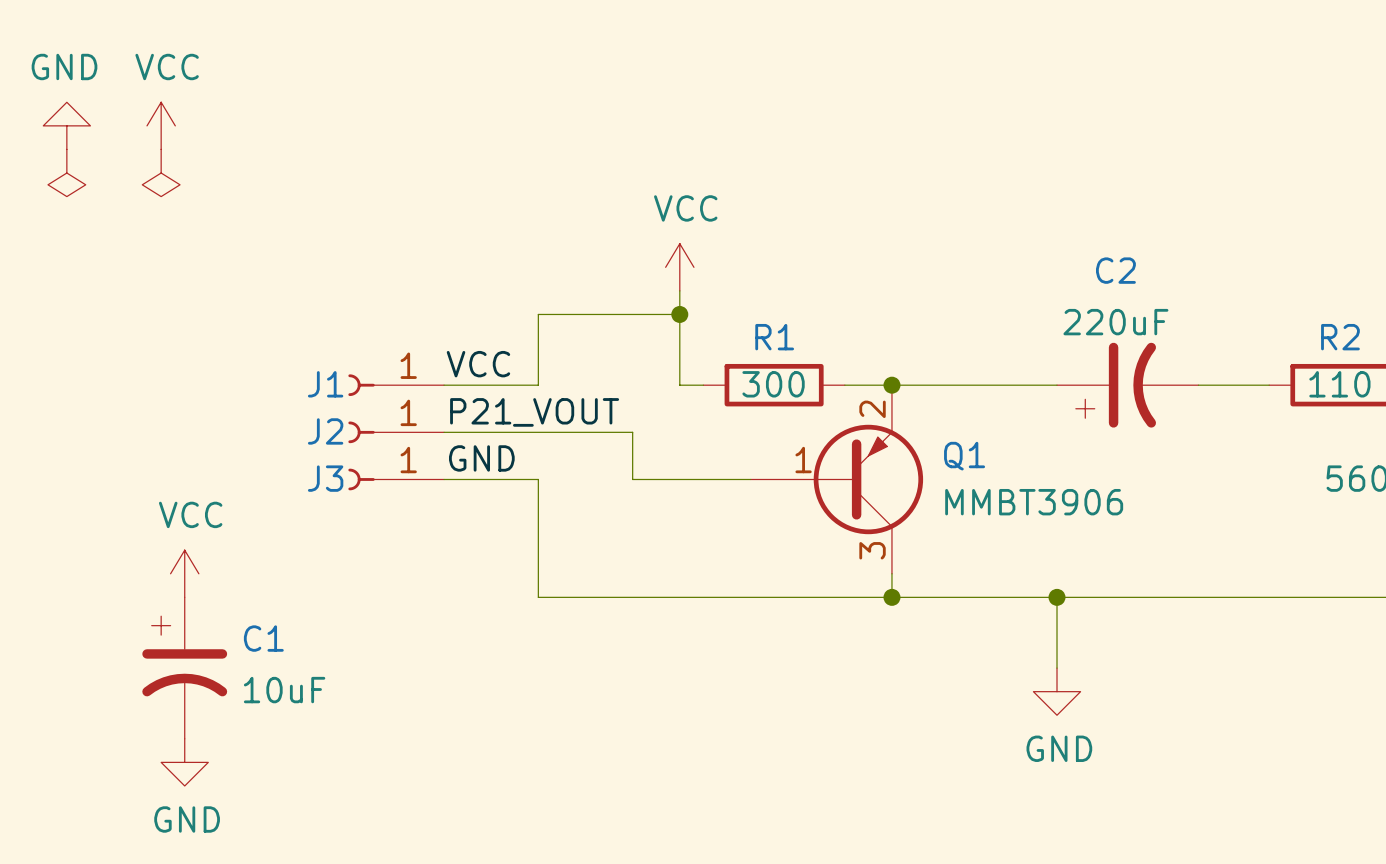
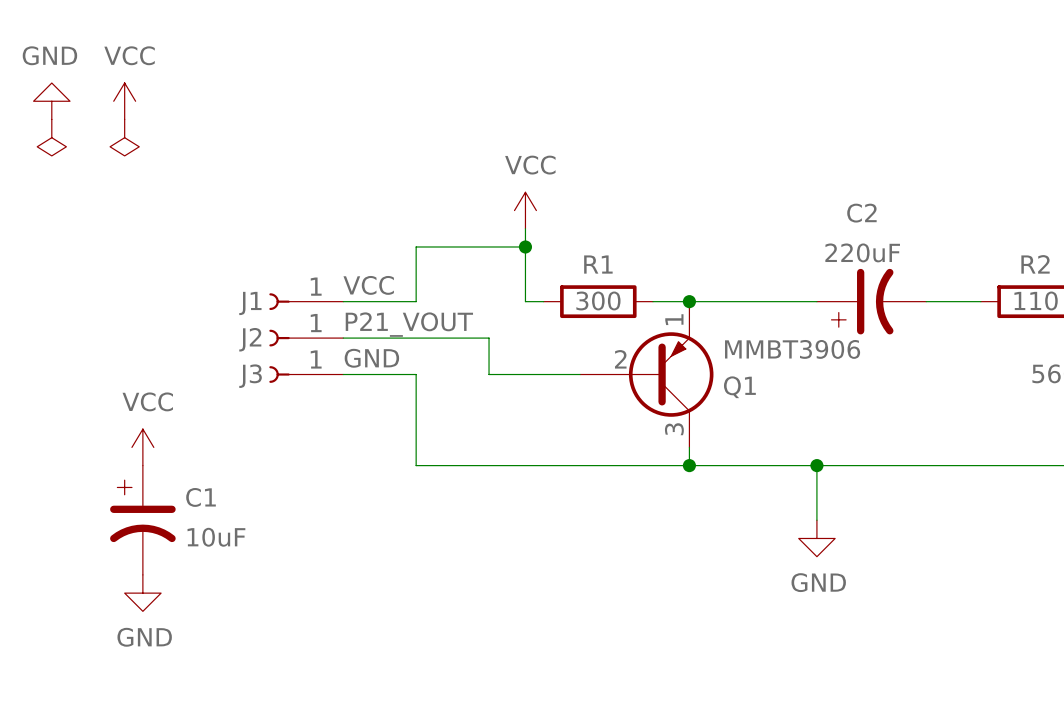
Q1 pin number: 2 (872, 409) -> 1 (674, 319)
Q1 name position: Q1 (964, 456) -> Q1 (739, 387)
Q1 pin number: 1 (803, 460) -> 2 (620, 359)
Q1 value position: MMBT3906 (1034, 502) -> MMBT3906 (792, 349)

